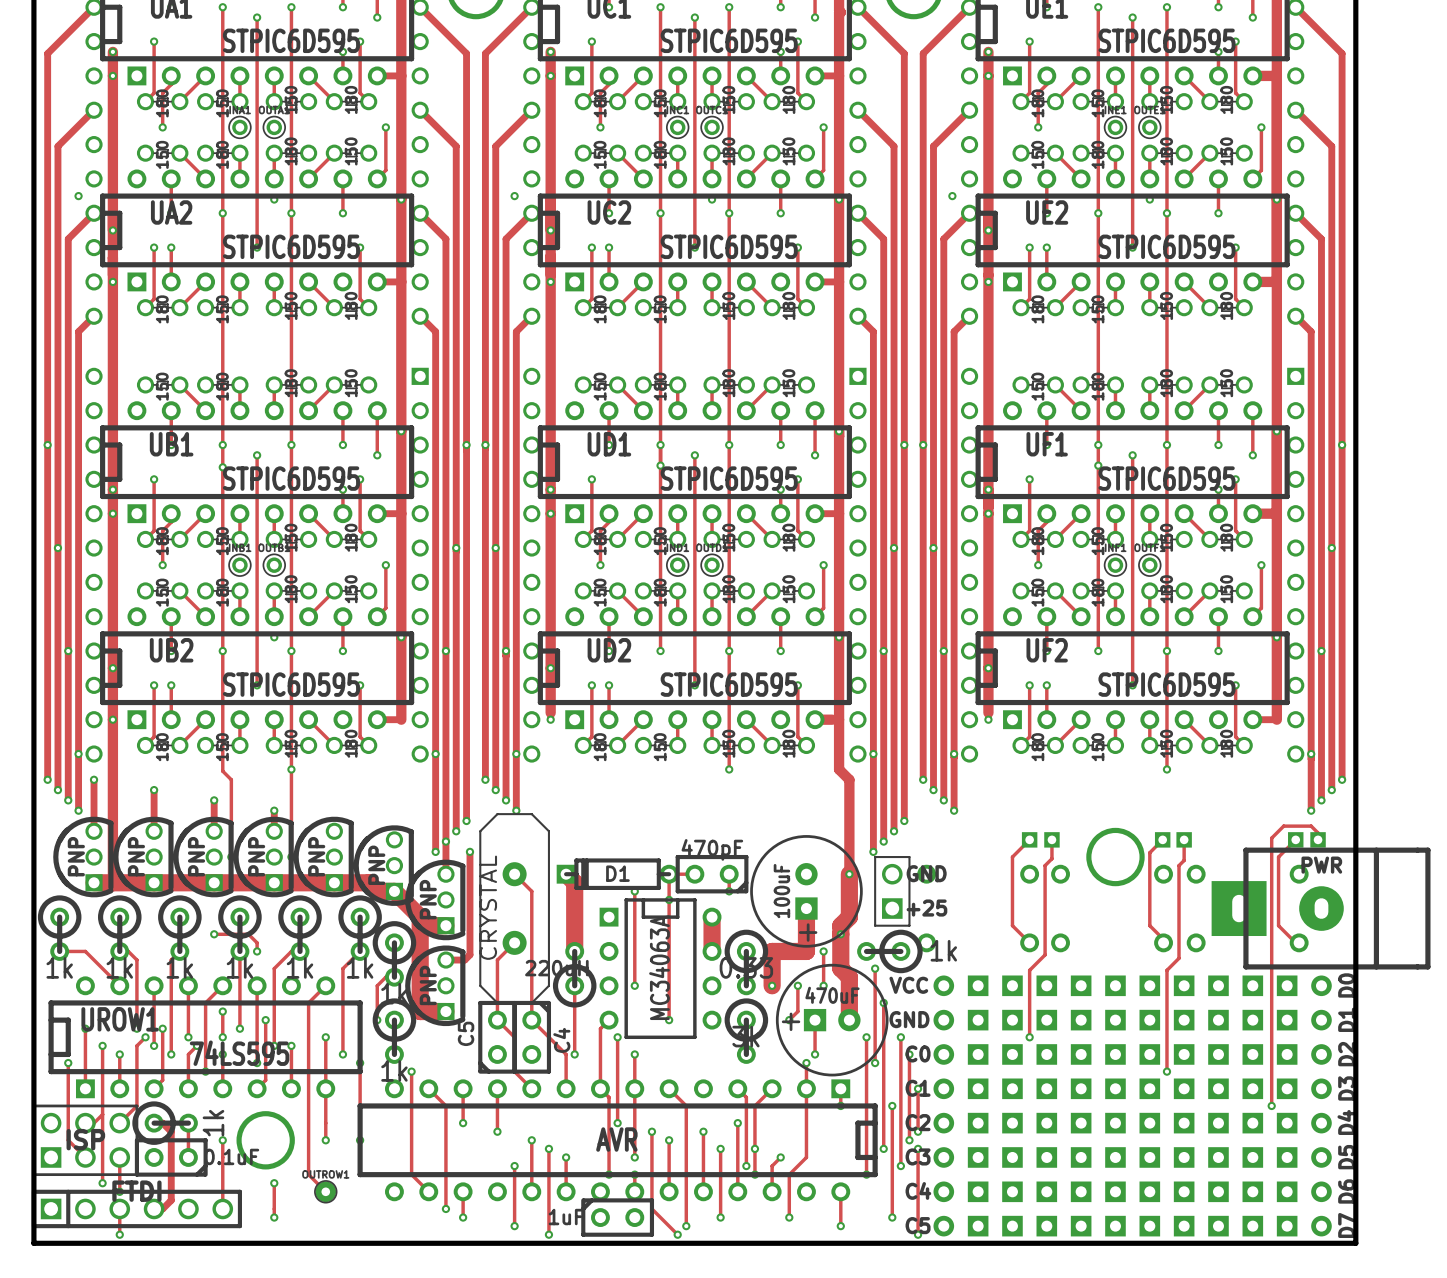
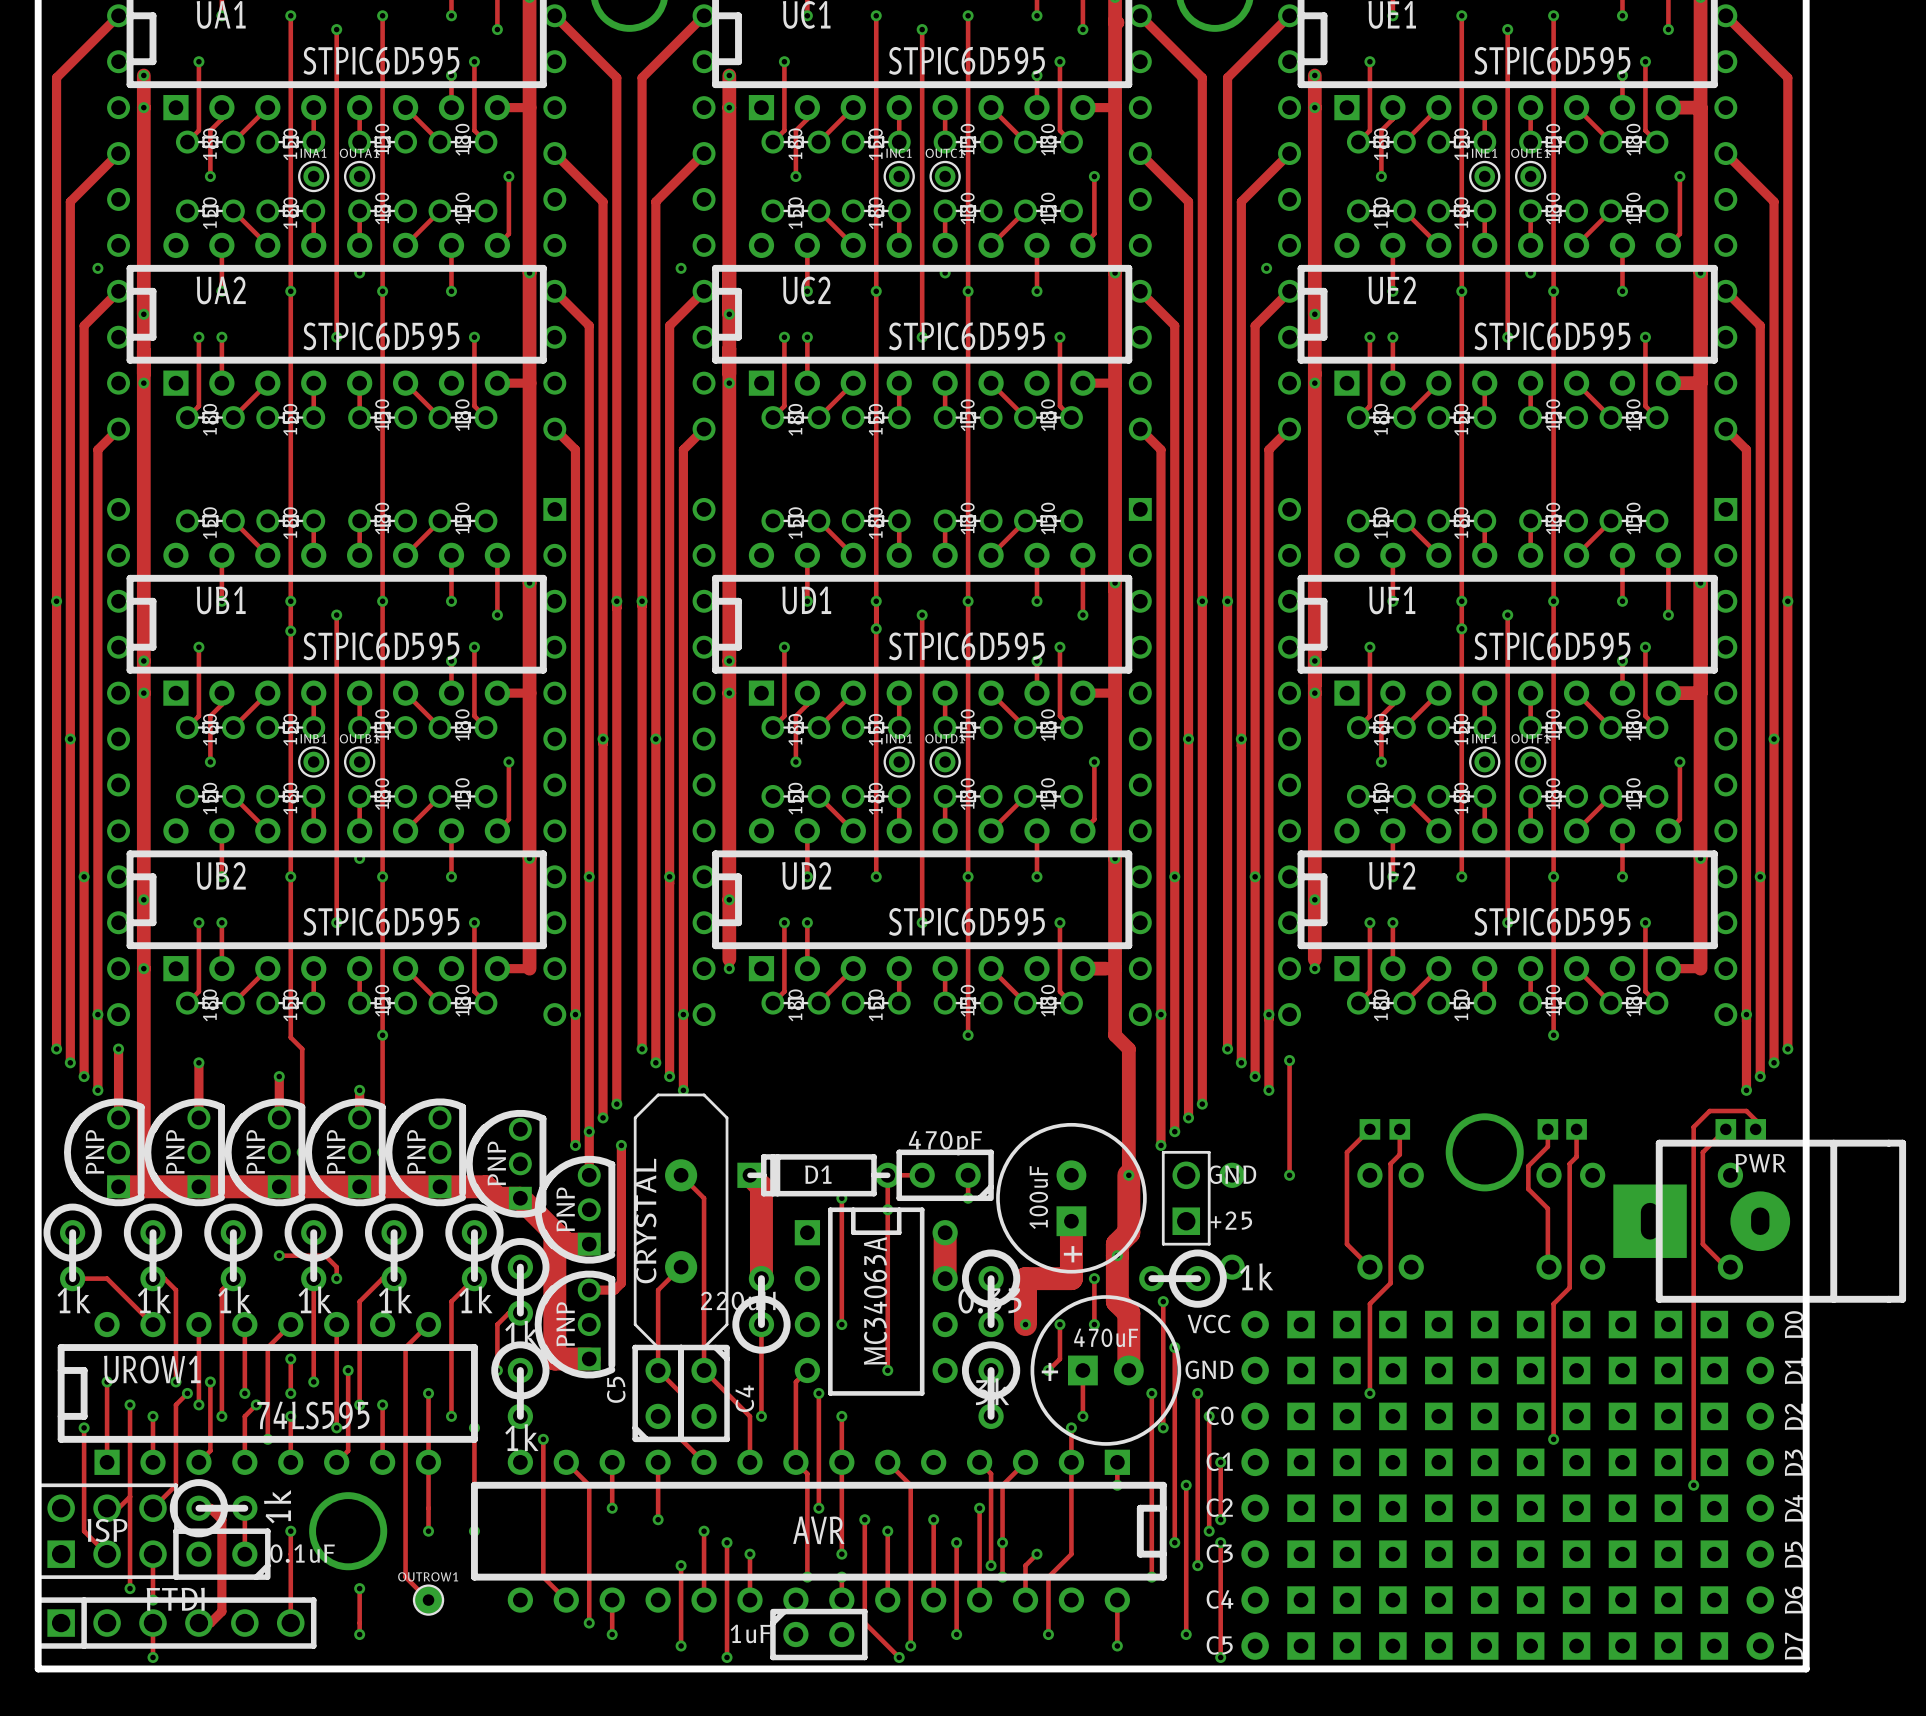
track: none -> (1289, 1060) (1289, 1175)
via: none -> (1289, 1060)
track: (1162, 839) (1149, 852) (1149, 925) (1163, 939) (1163, 942) -> (1547, 1129) (1547, 1146) (1528, 1166) (1528, 1189) (1547, 1208) (1547, 1266)
via: none -> (1289, 1175)

